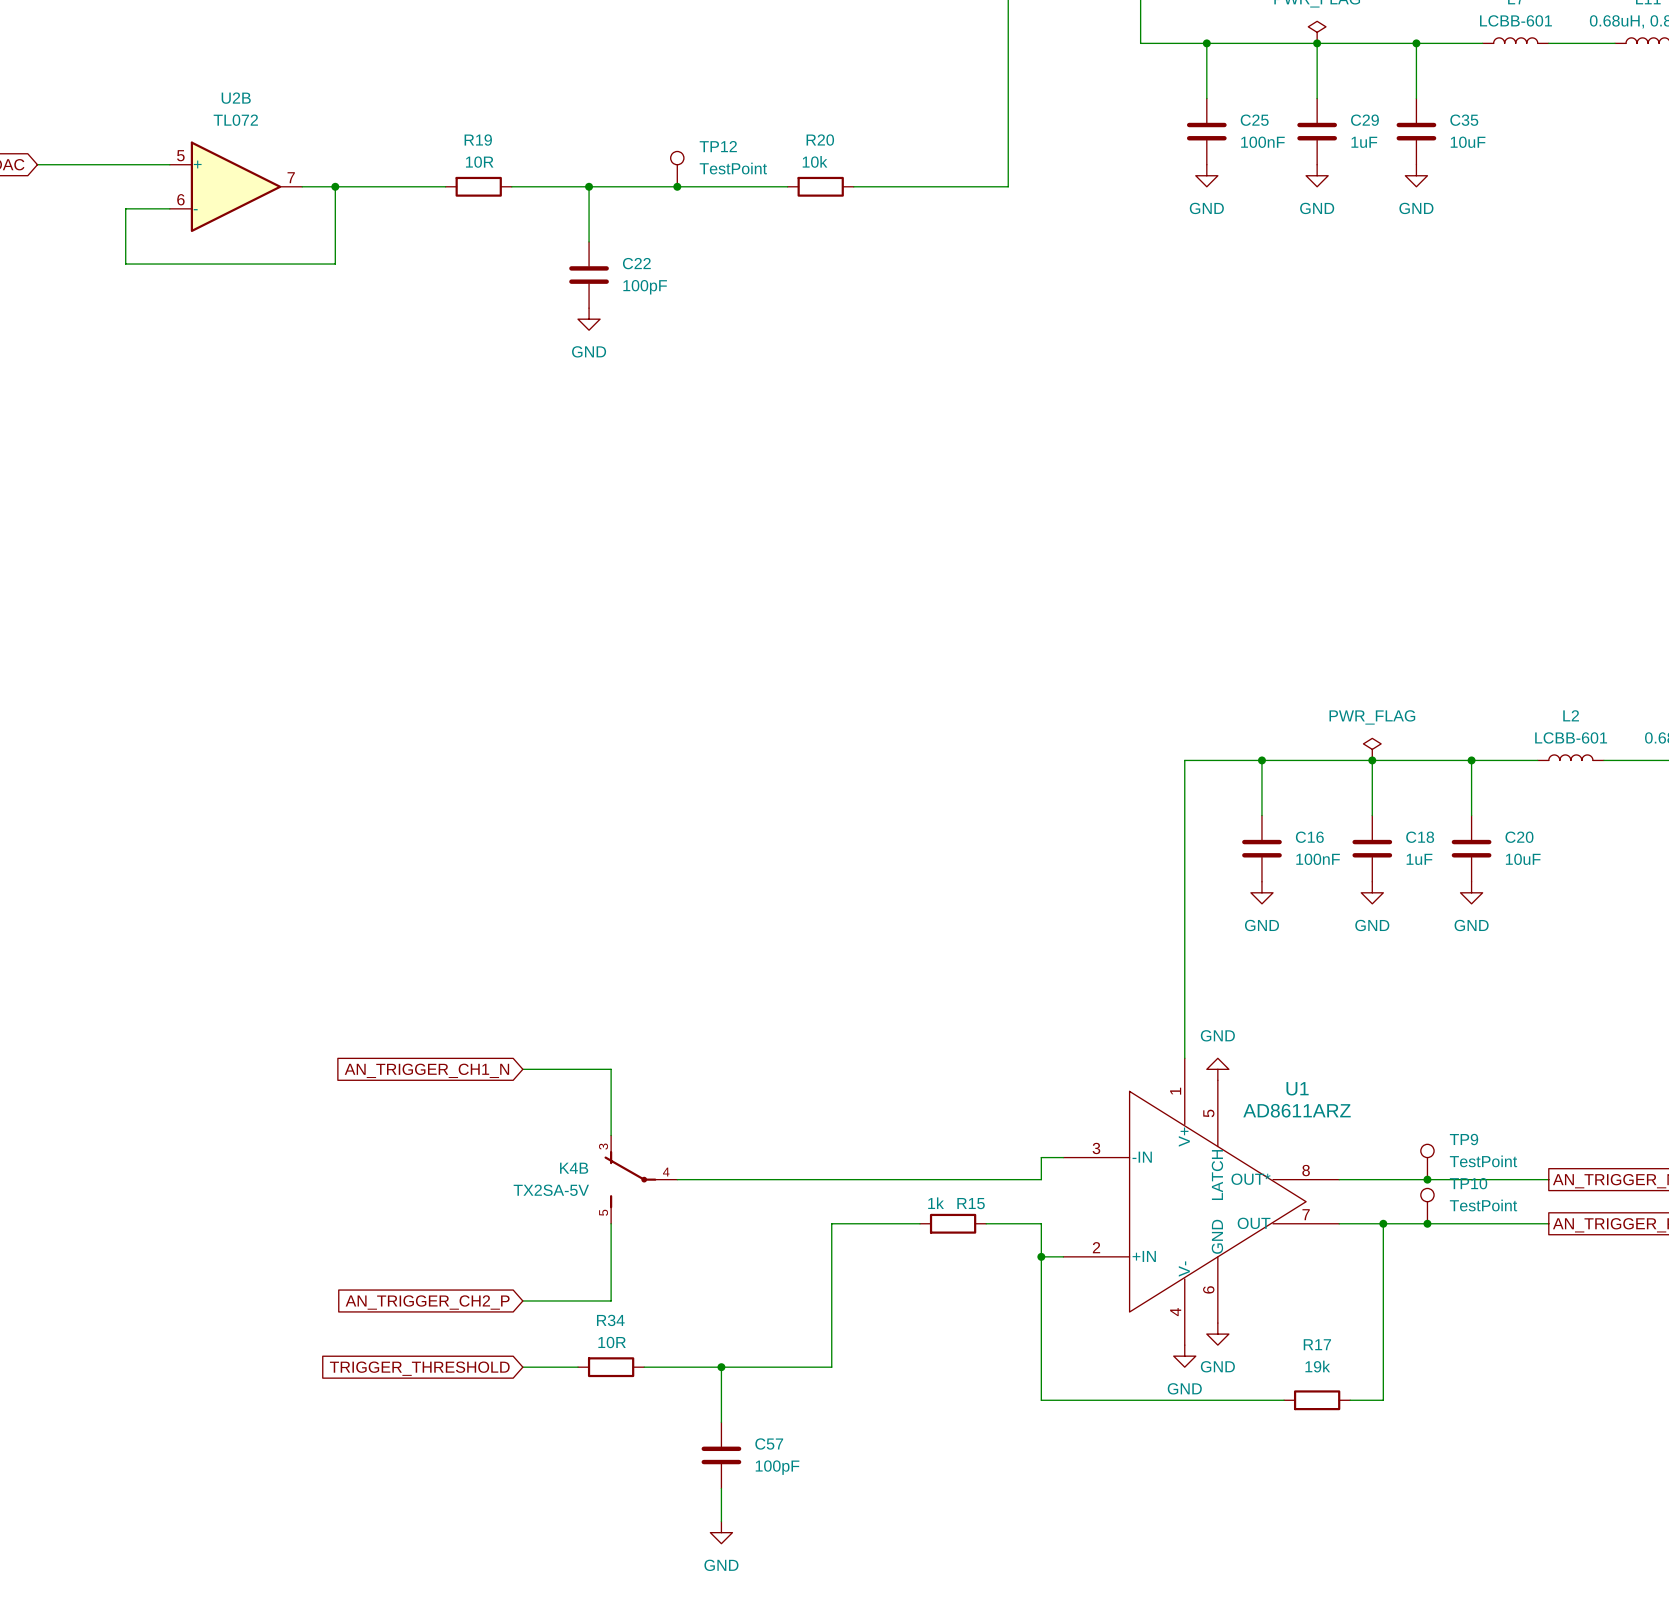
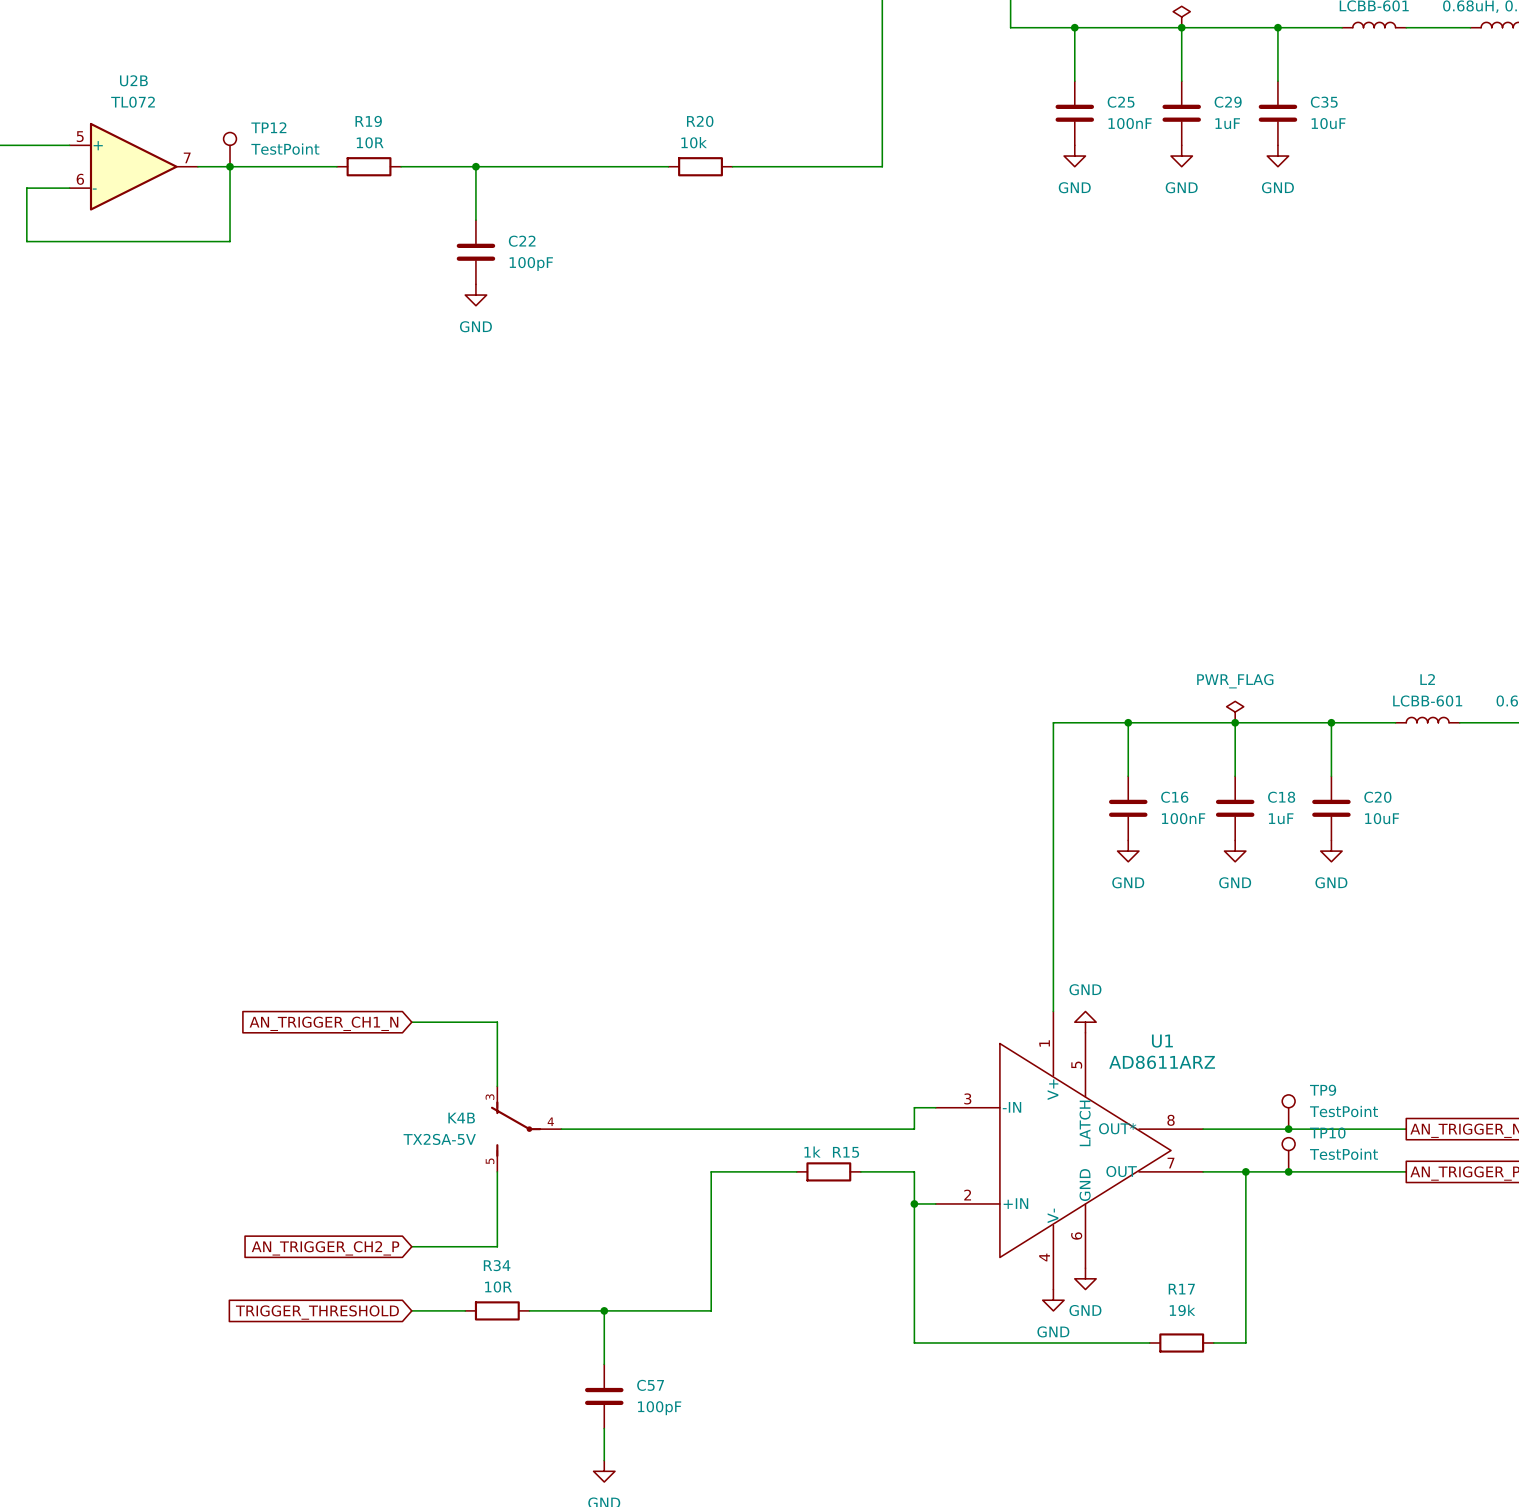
TP12 position: (677, 169) -> (230, 149)
junction: (677, 186) -> none

